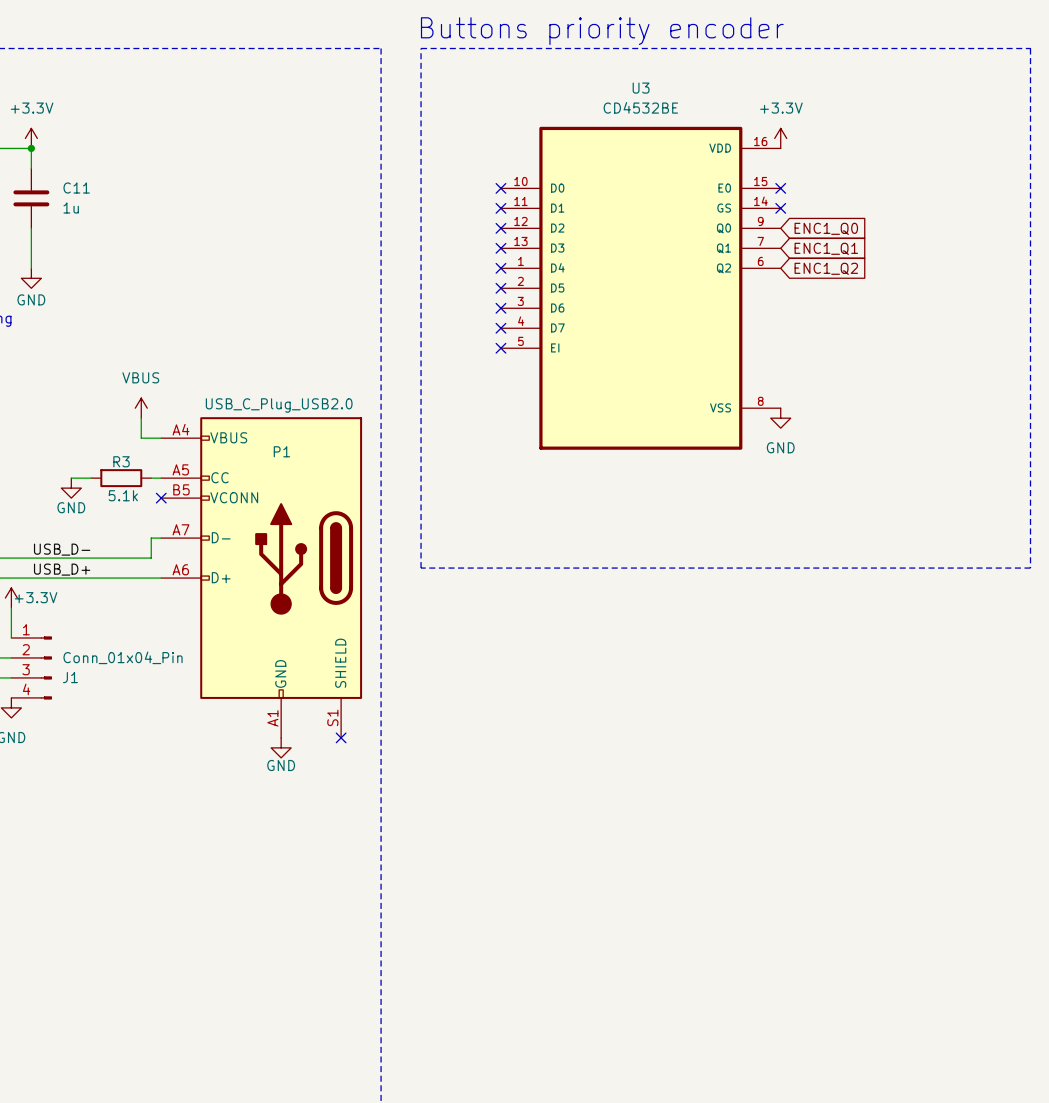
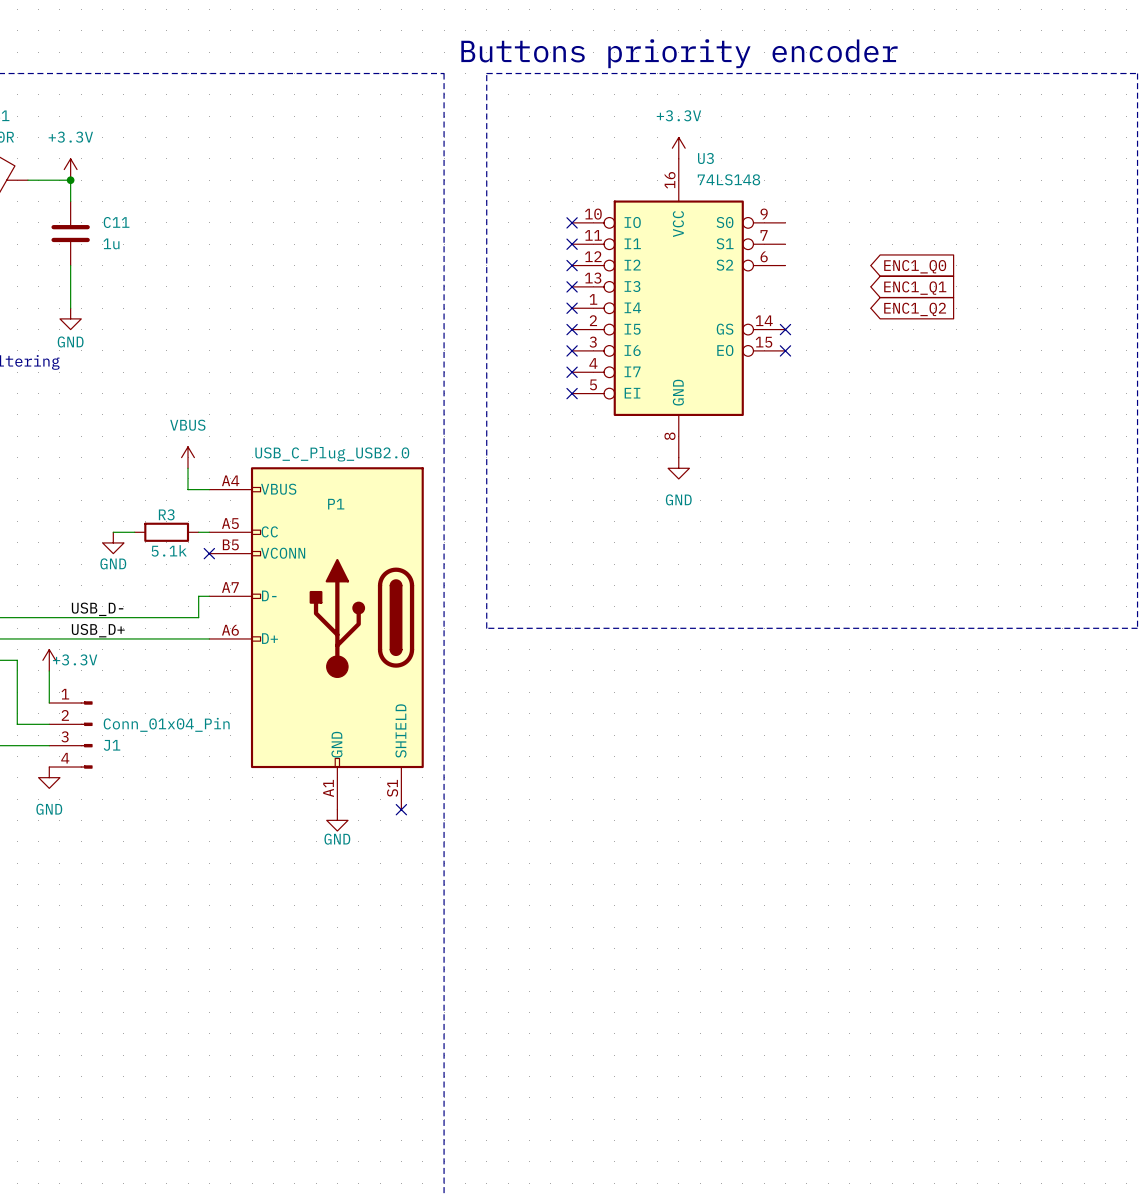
U3 name position: U3 (641, 88) -> U3 (705, 158)
U3 value: CD4532BE (640, 107) -> 74LS148 (728, 179)
U3 symbol: [500, 126, 781, 450] -> [572, 158, 786, 458]
power symbol position: +3.3V (780, 138) -> +3.3V (678, 148)
no-connect mark: (780, 188) -> none
no-connect mark: (780, 208) -> none
no-connect mark: none -> (785, 329)
no-connect mark: none -> (785, 350)
power symbol position: GND (780, 418) -> GND (678, 468)

